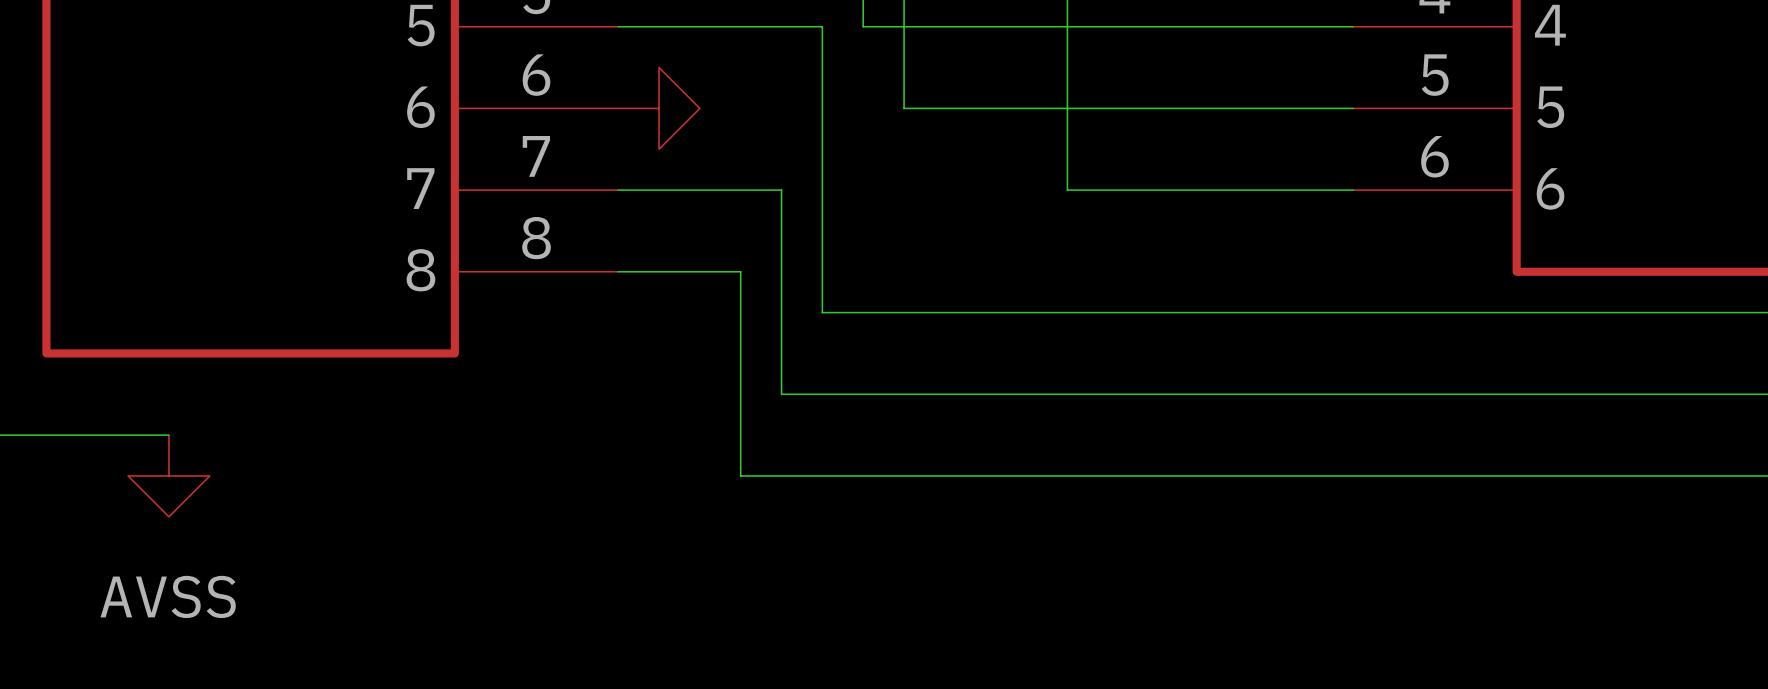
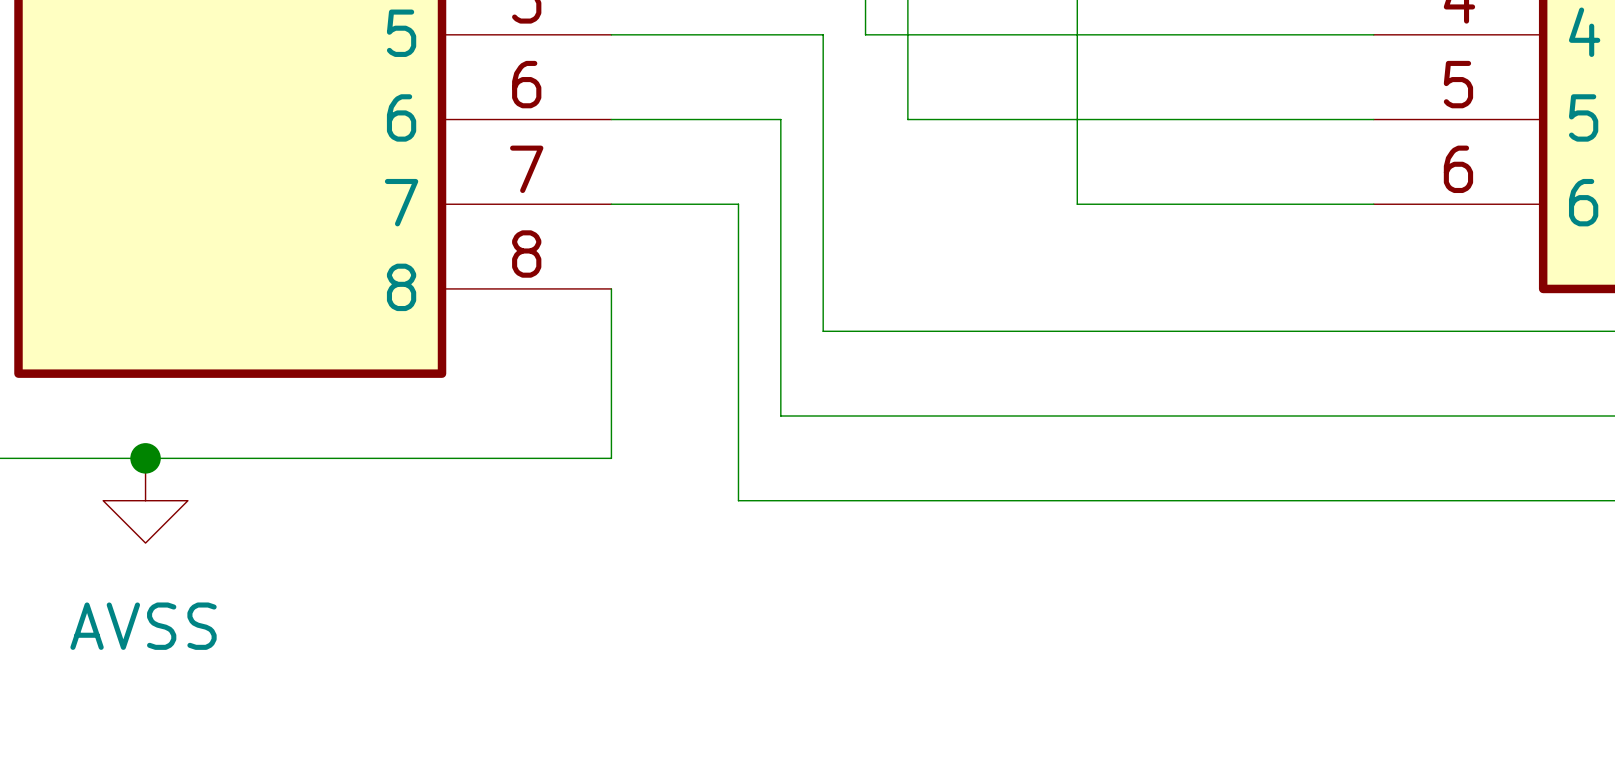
wire: none -> (611, 119) (780, 119) (780, 204)
power symbol: (659, 108) -> none
wire: (740, 190) (781, 190) -> (738, 204) (738, 288)
wire: (618, 271) (740, 271) -> (611, 288) (611, 458) (145, 458)
junction: none -> (145, 458)

